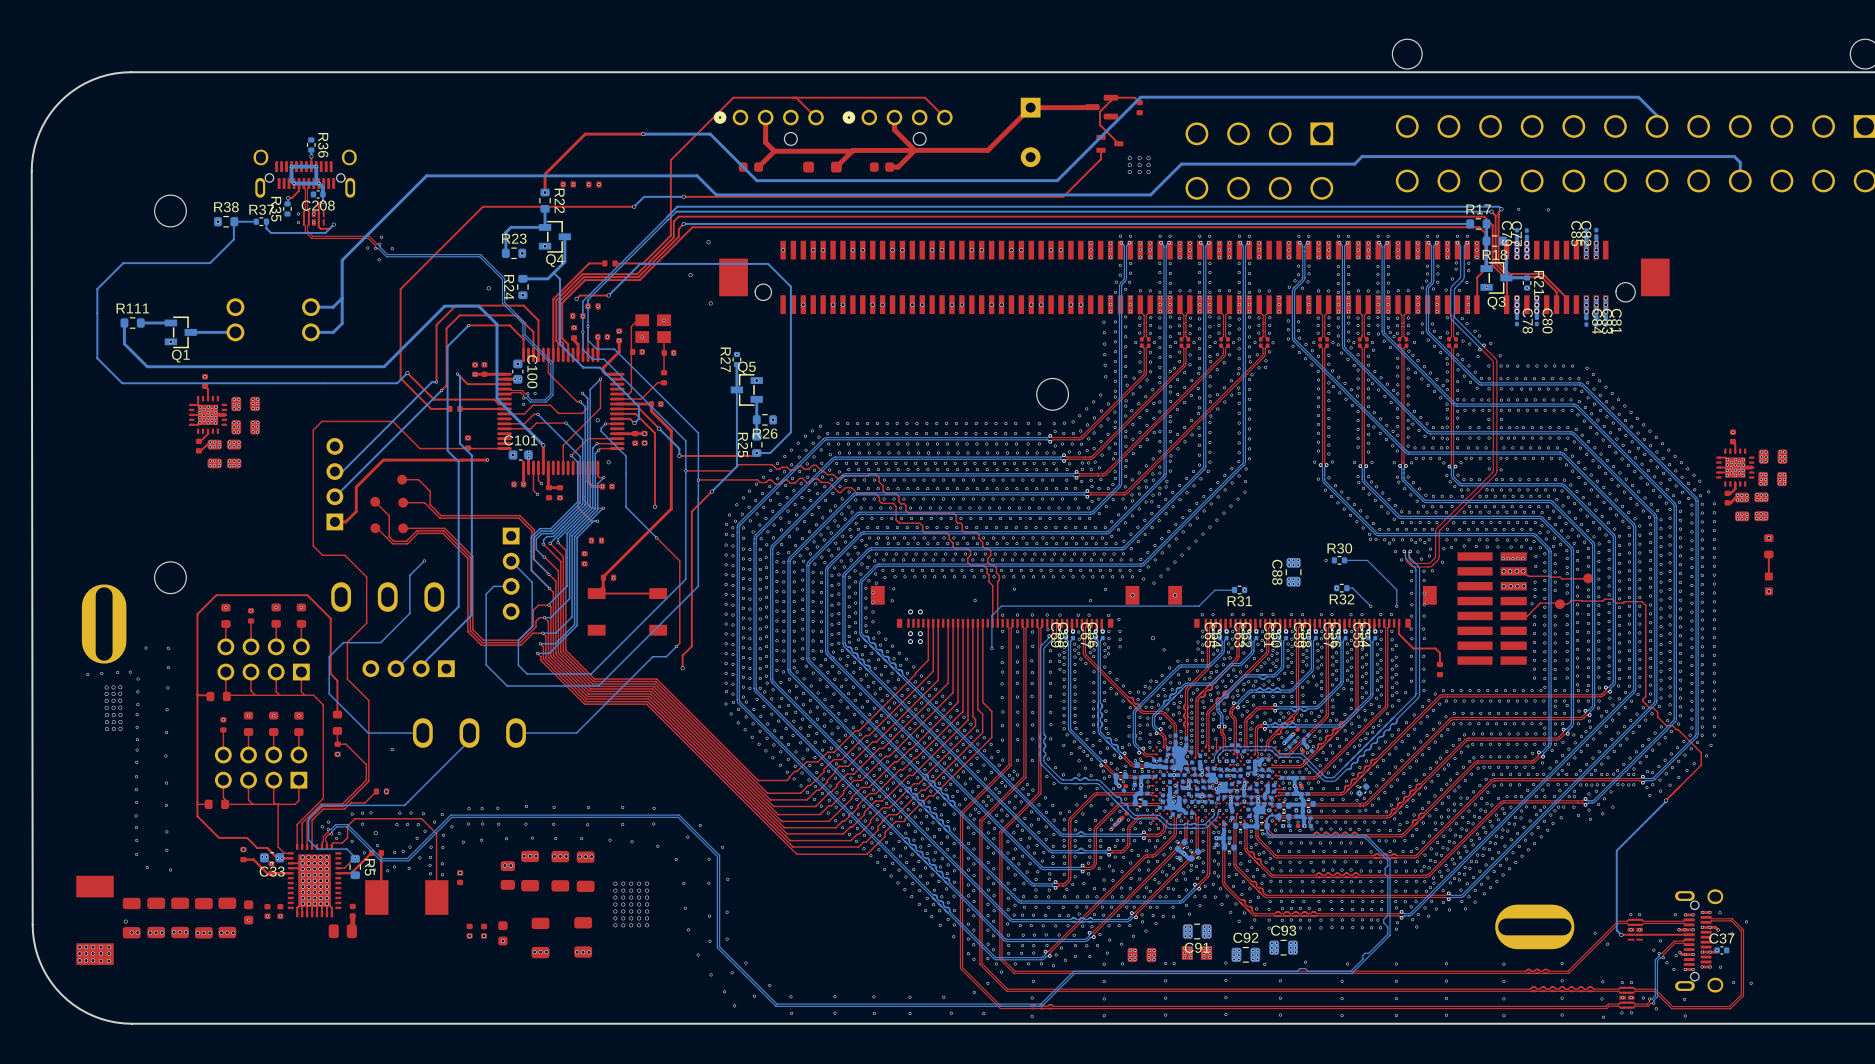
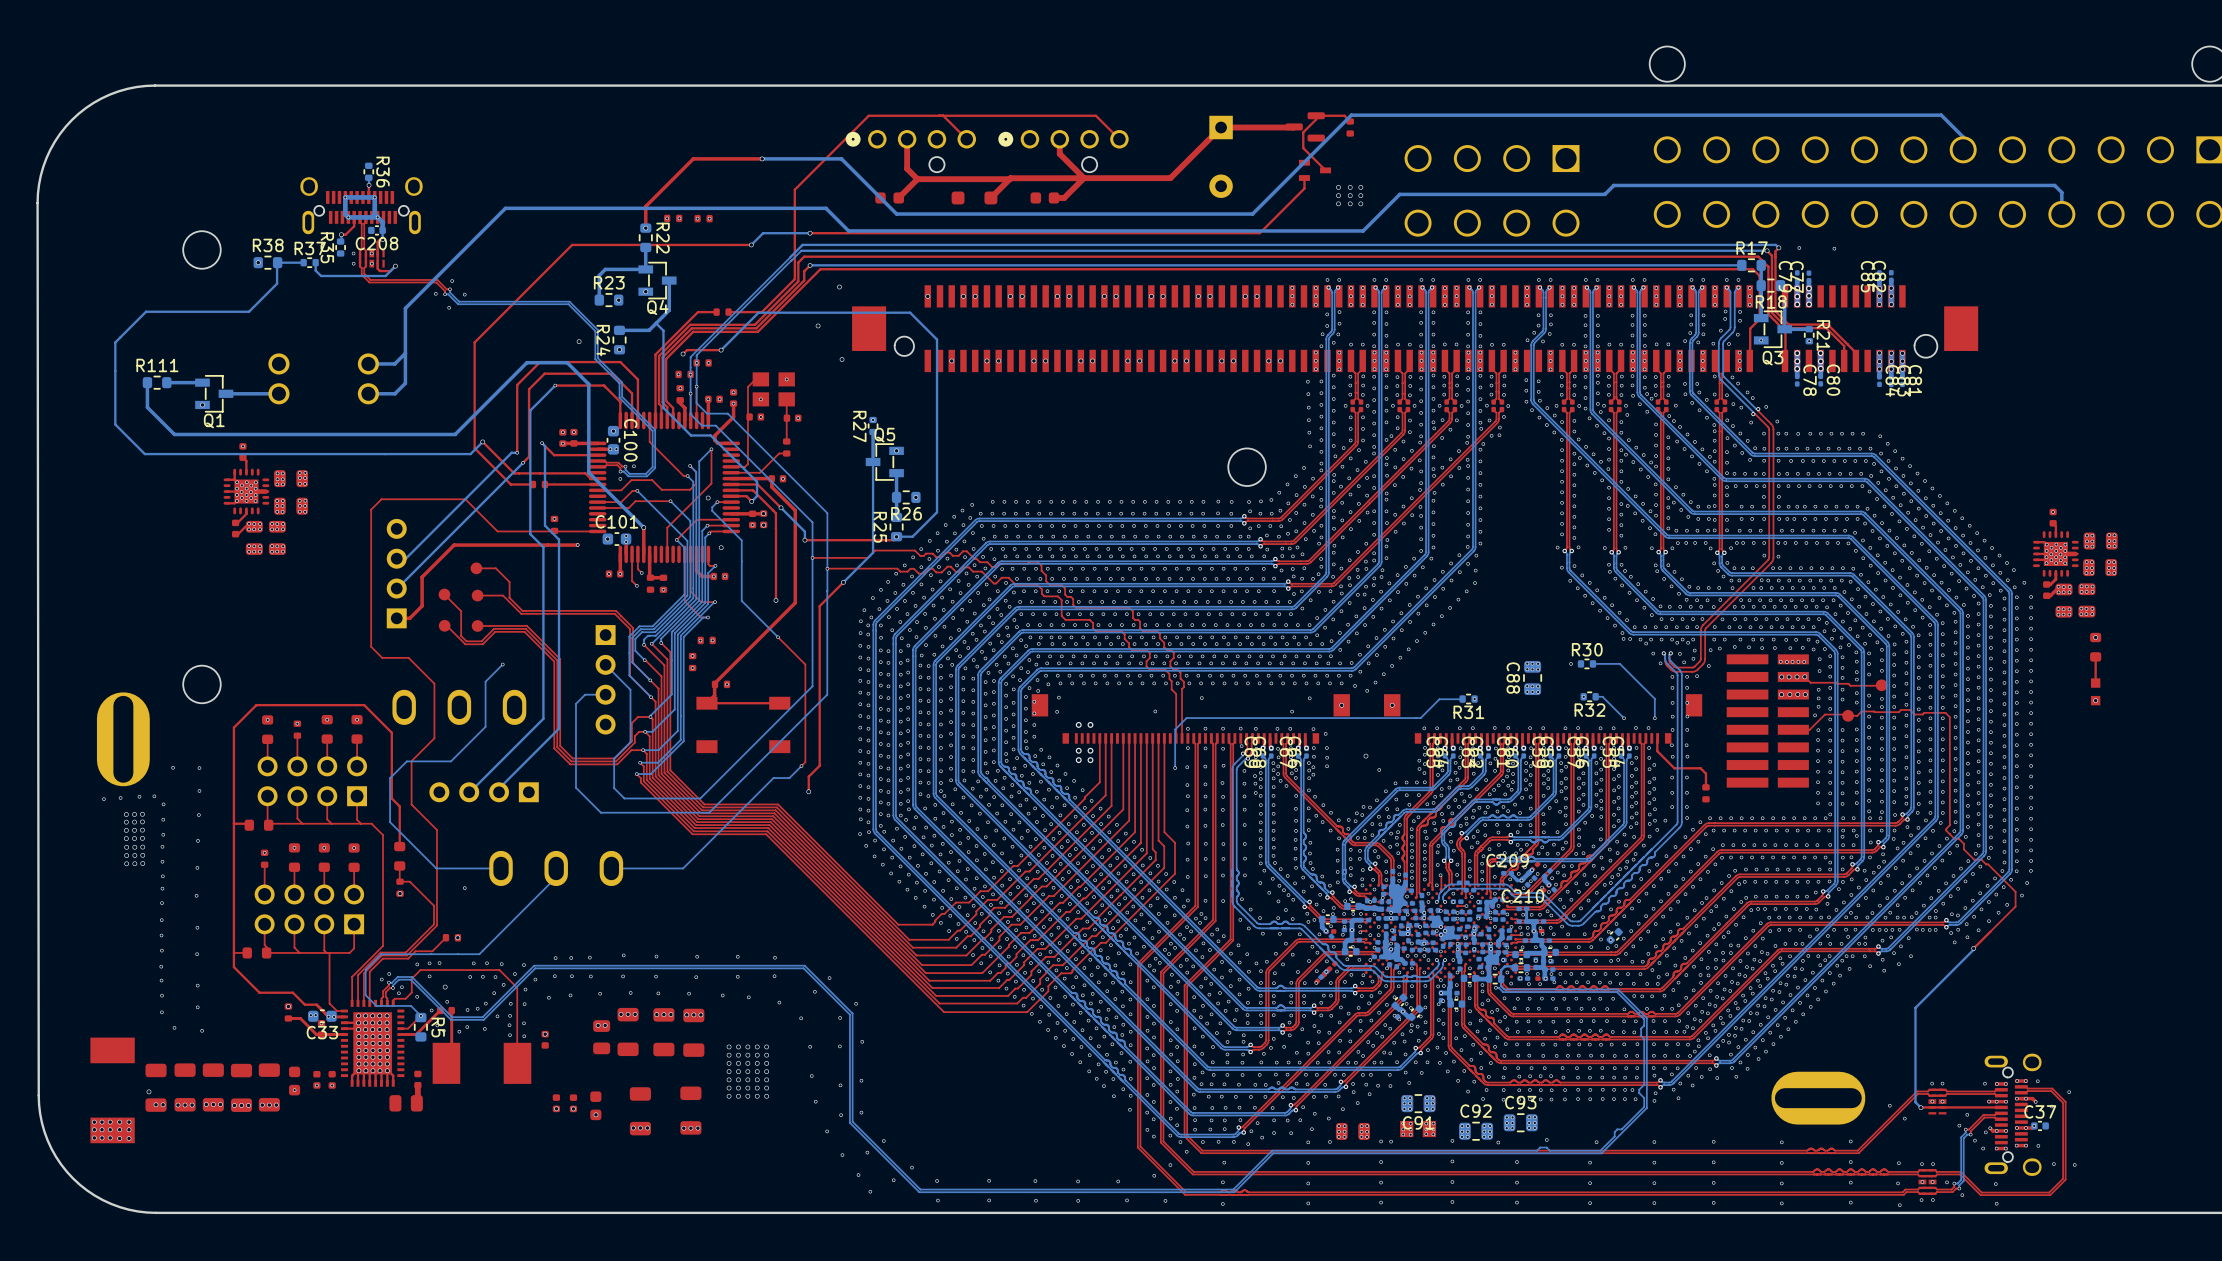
C209: none -> (1507, 873)
bottom track: none -> (1511, 873) (1517, 880) (1521, 880)
C210: none -> (1522, 908)
bottom track: none -> (1526, 908) (1526, 921)

